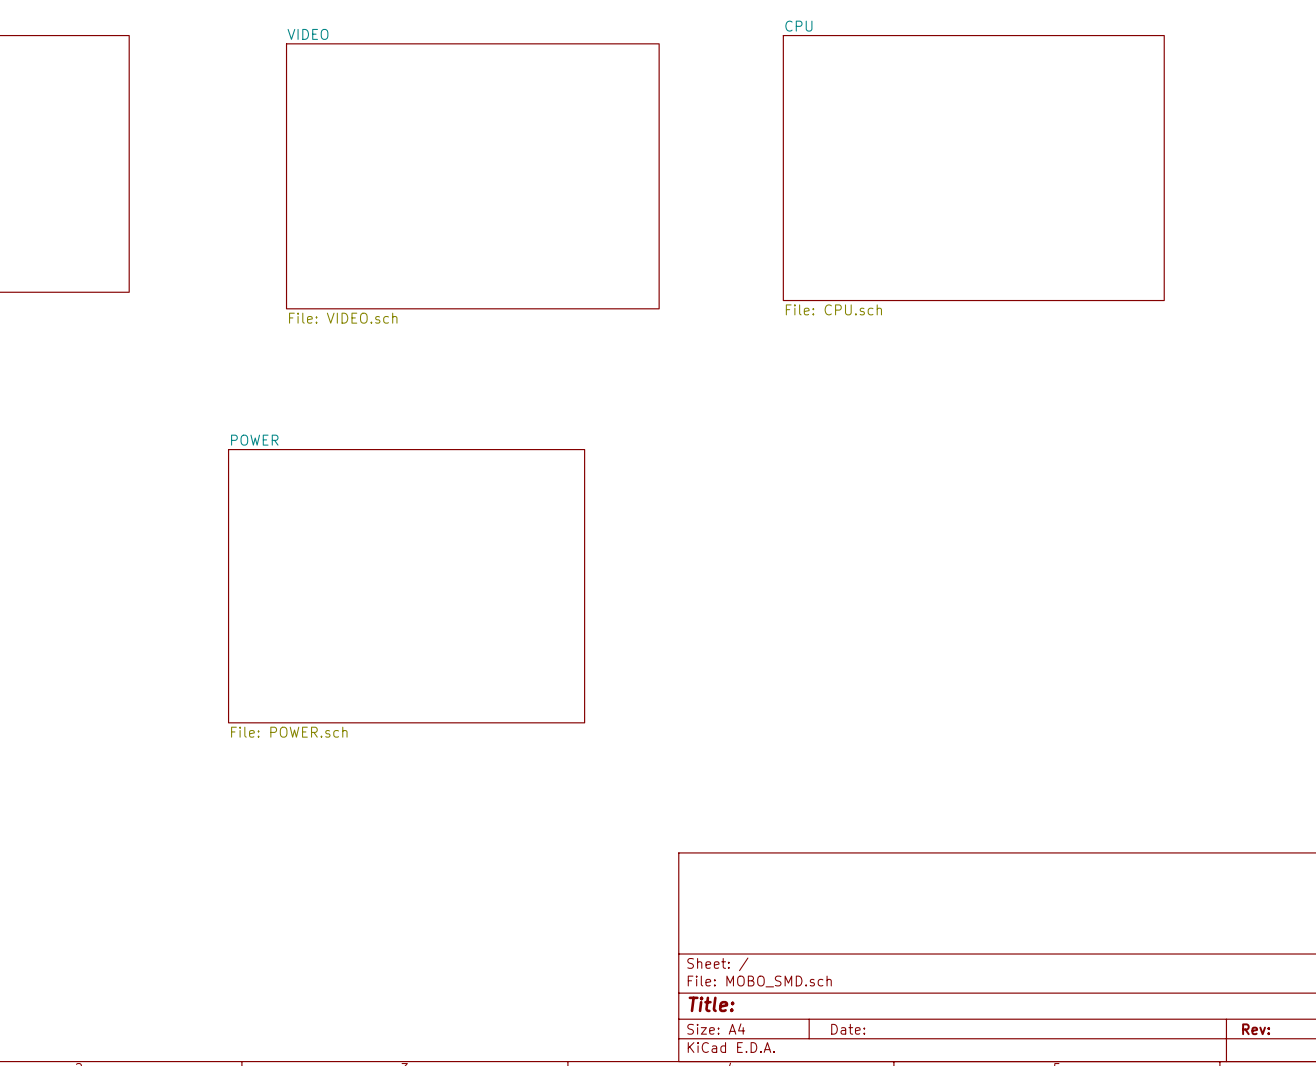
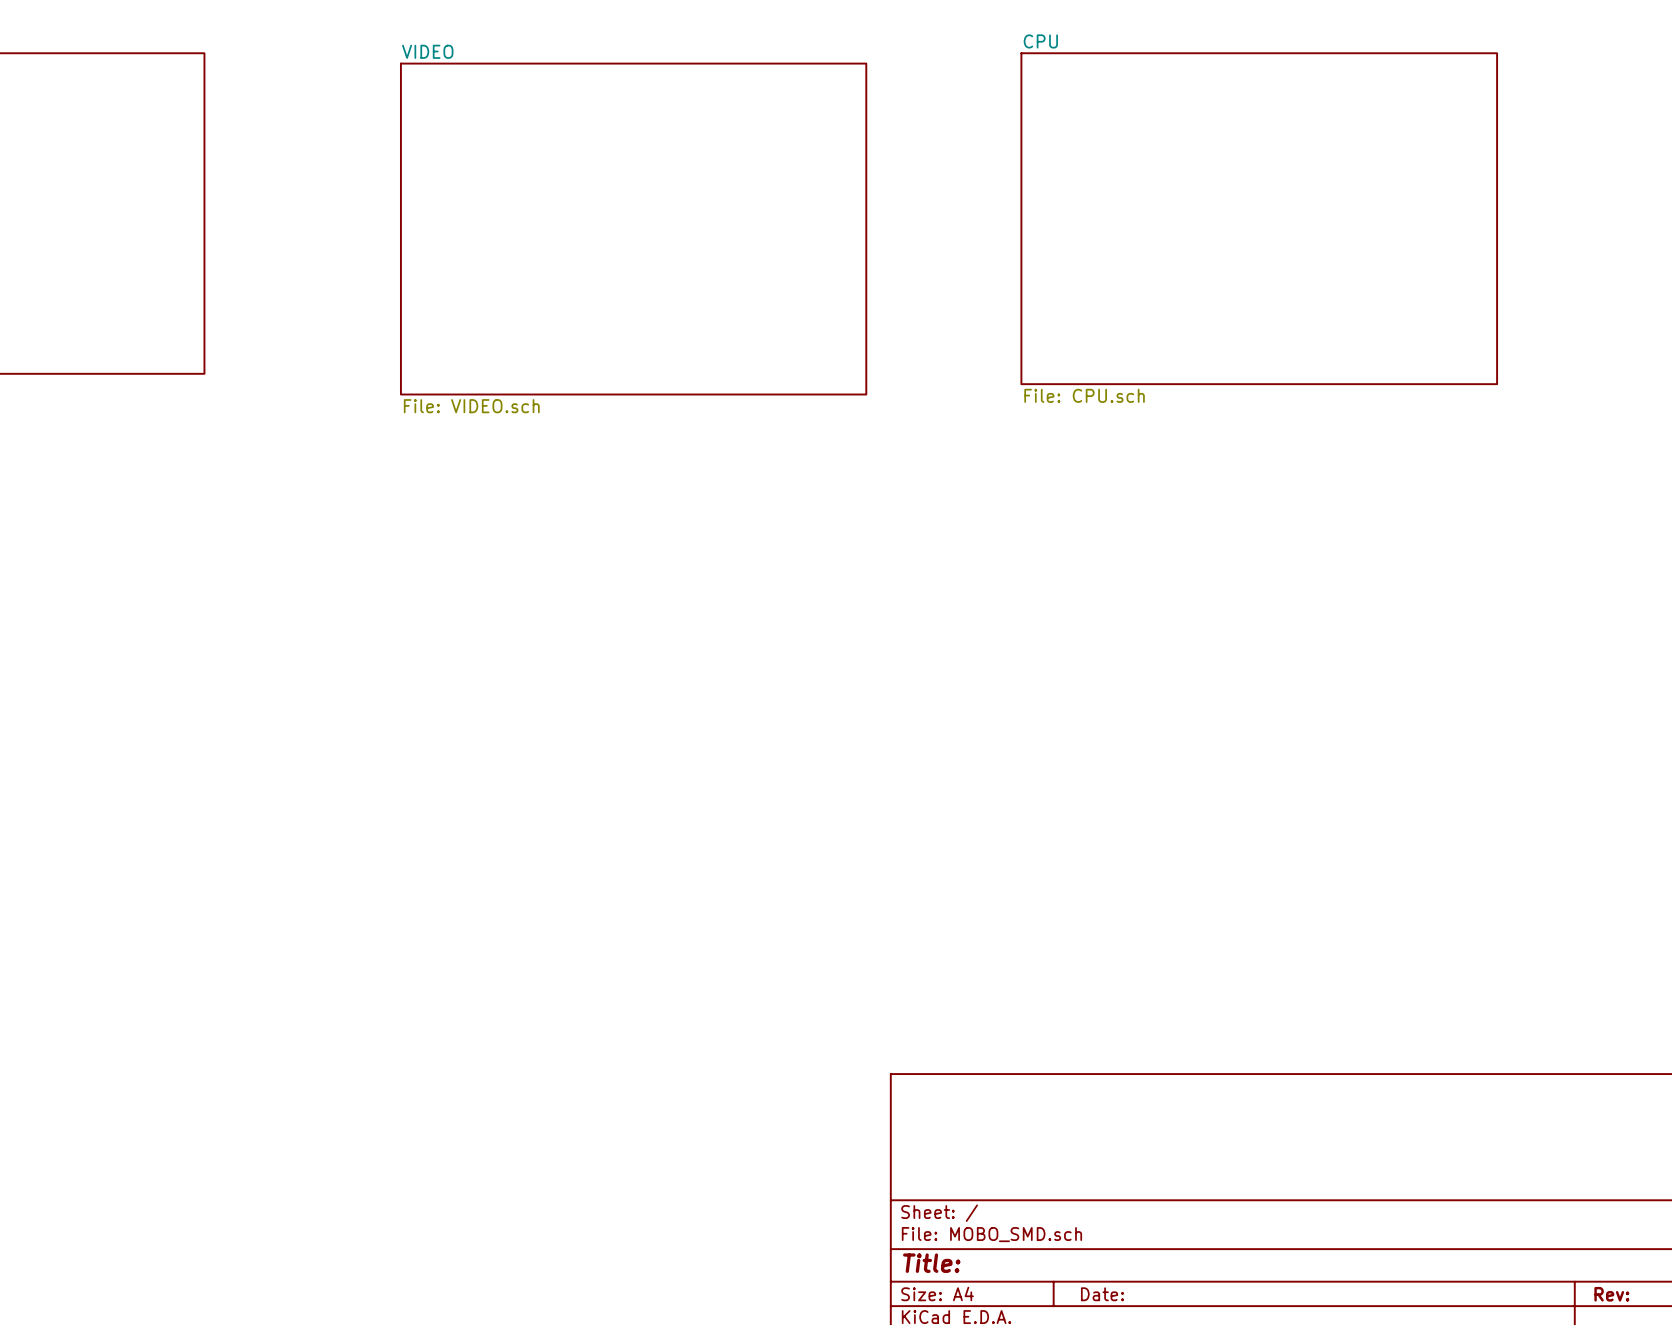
sheet POWER: File: POWER.sch (406, 586) -> none

